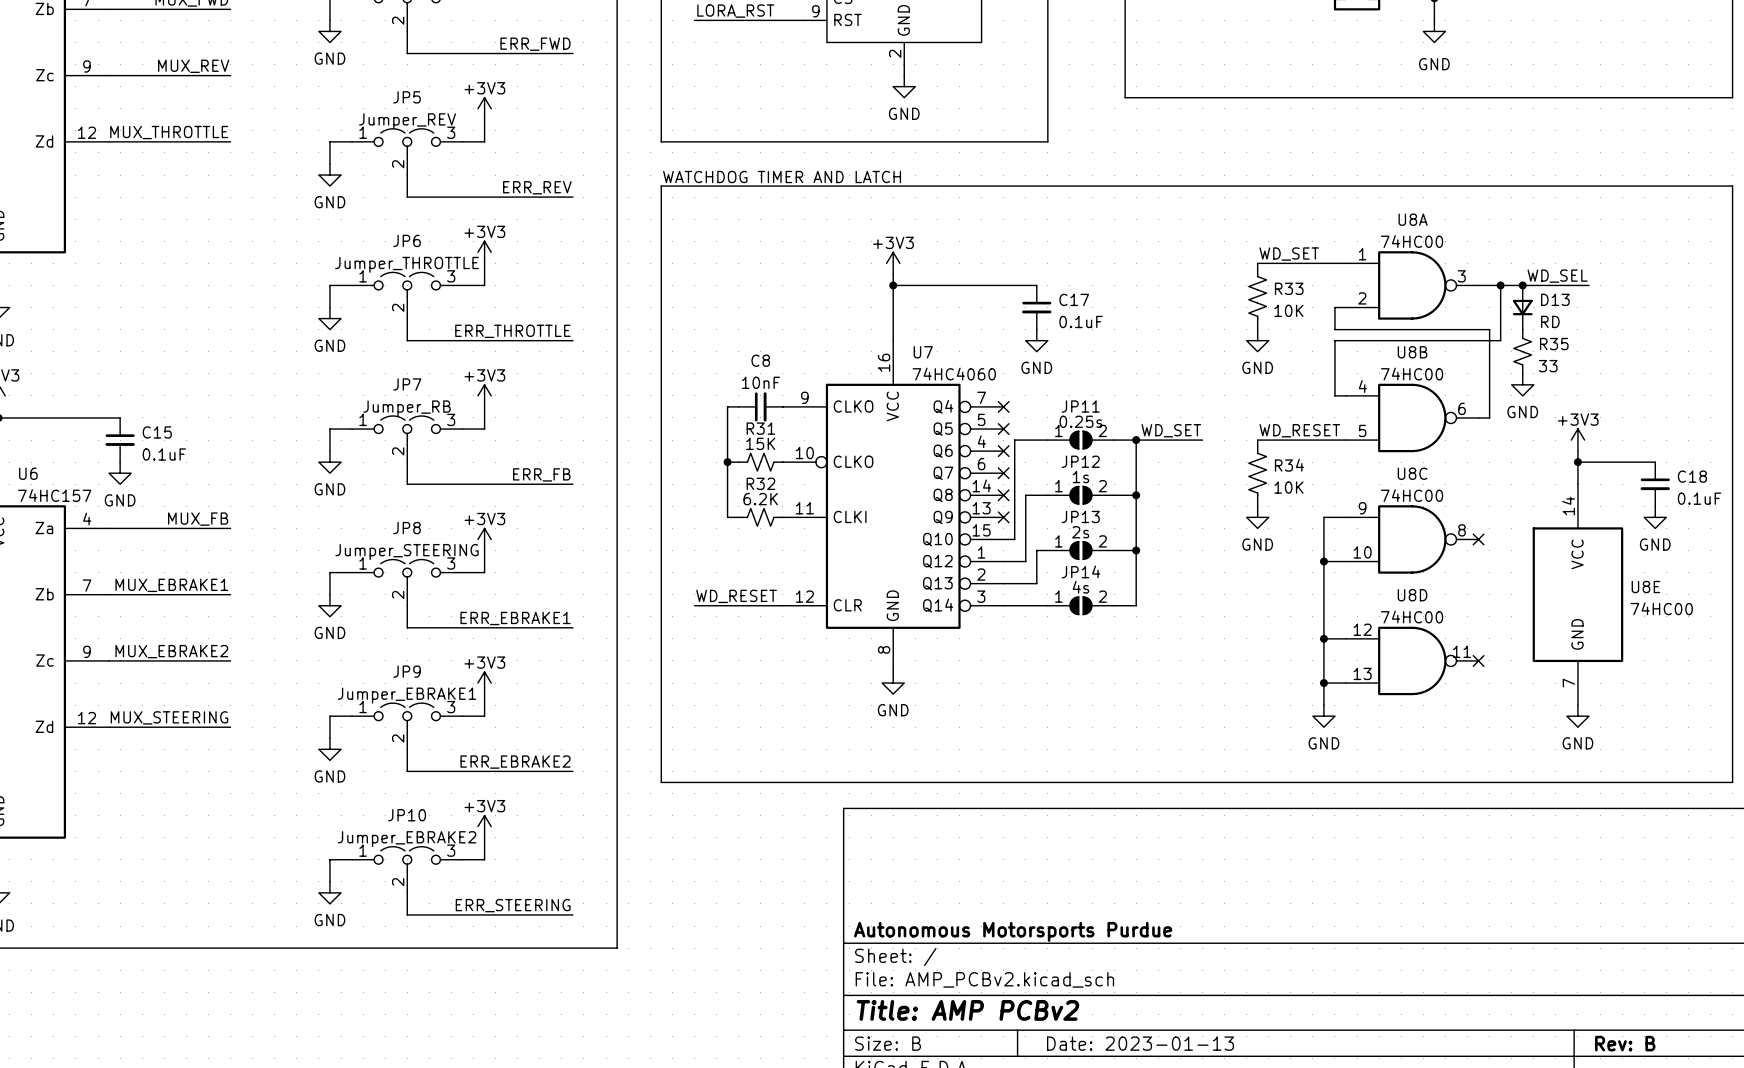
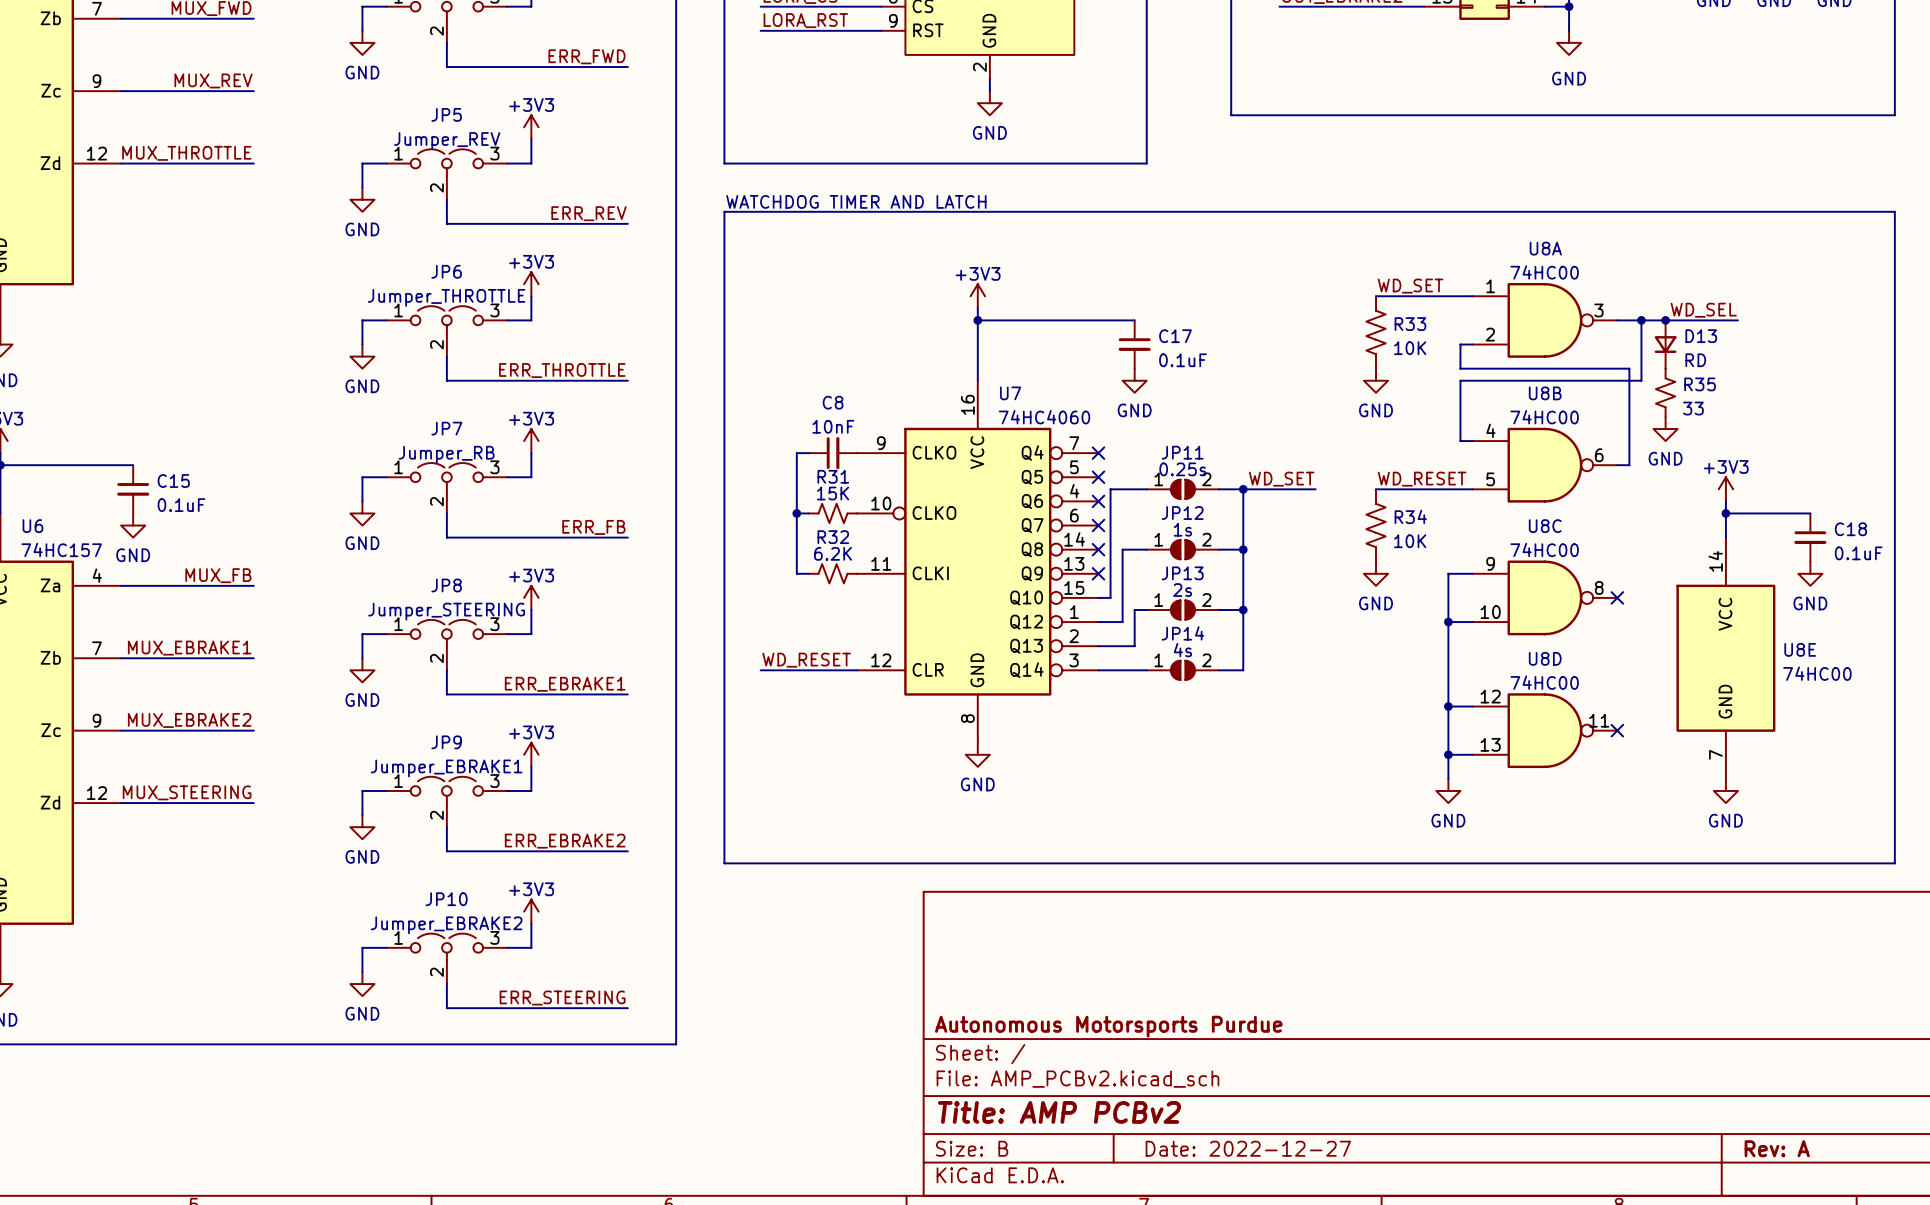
title block: Date: 2023-01-13 (1140, 1043) -> Date: 2022-12-27 (1248, 1148)
title block: Rev: B (1625, 1043) -> Rev: A (1777, 1148)

